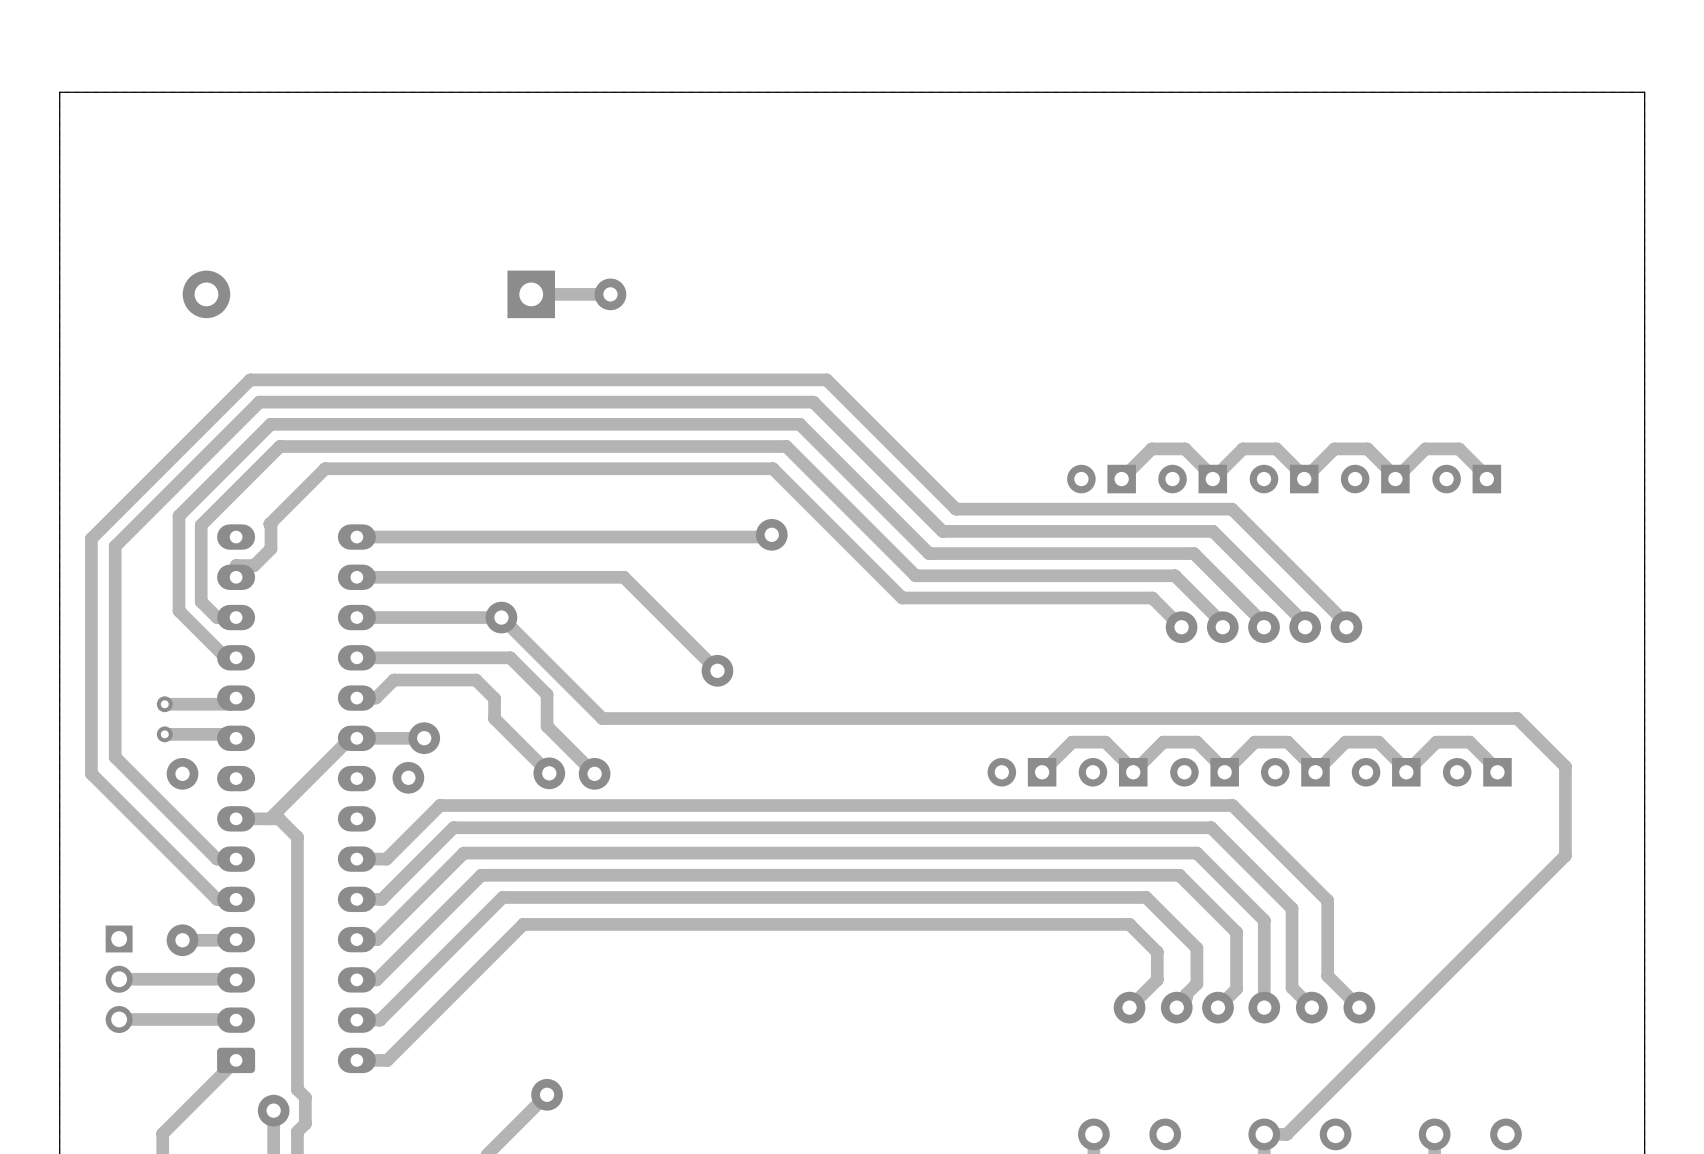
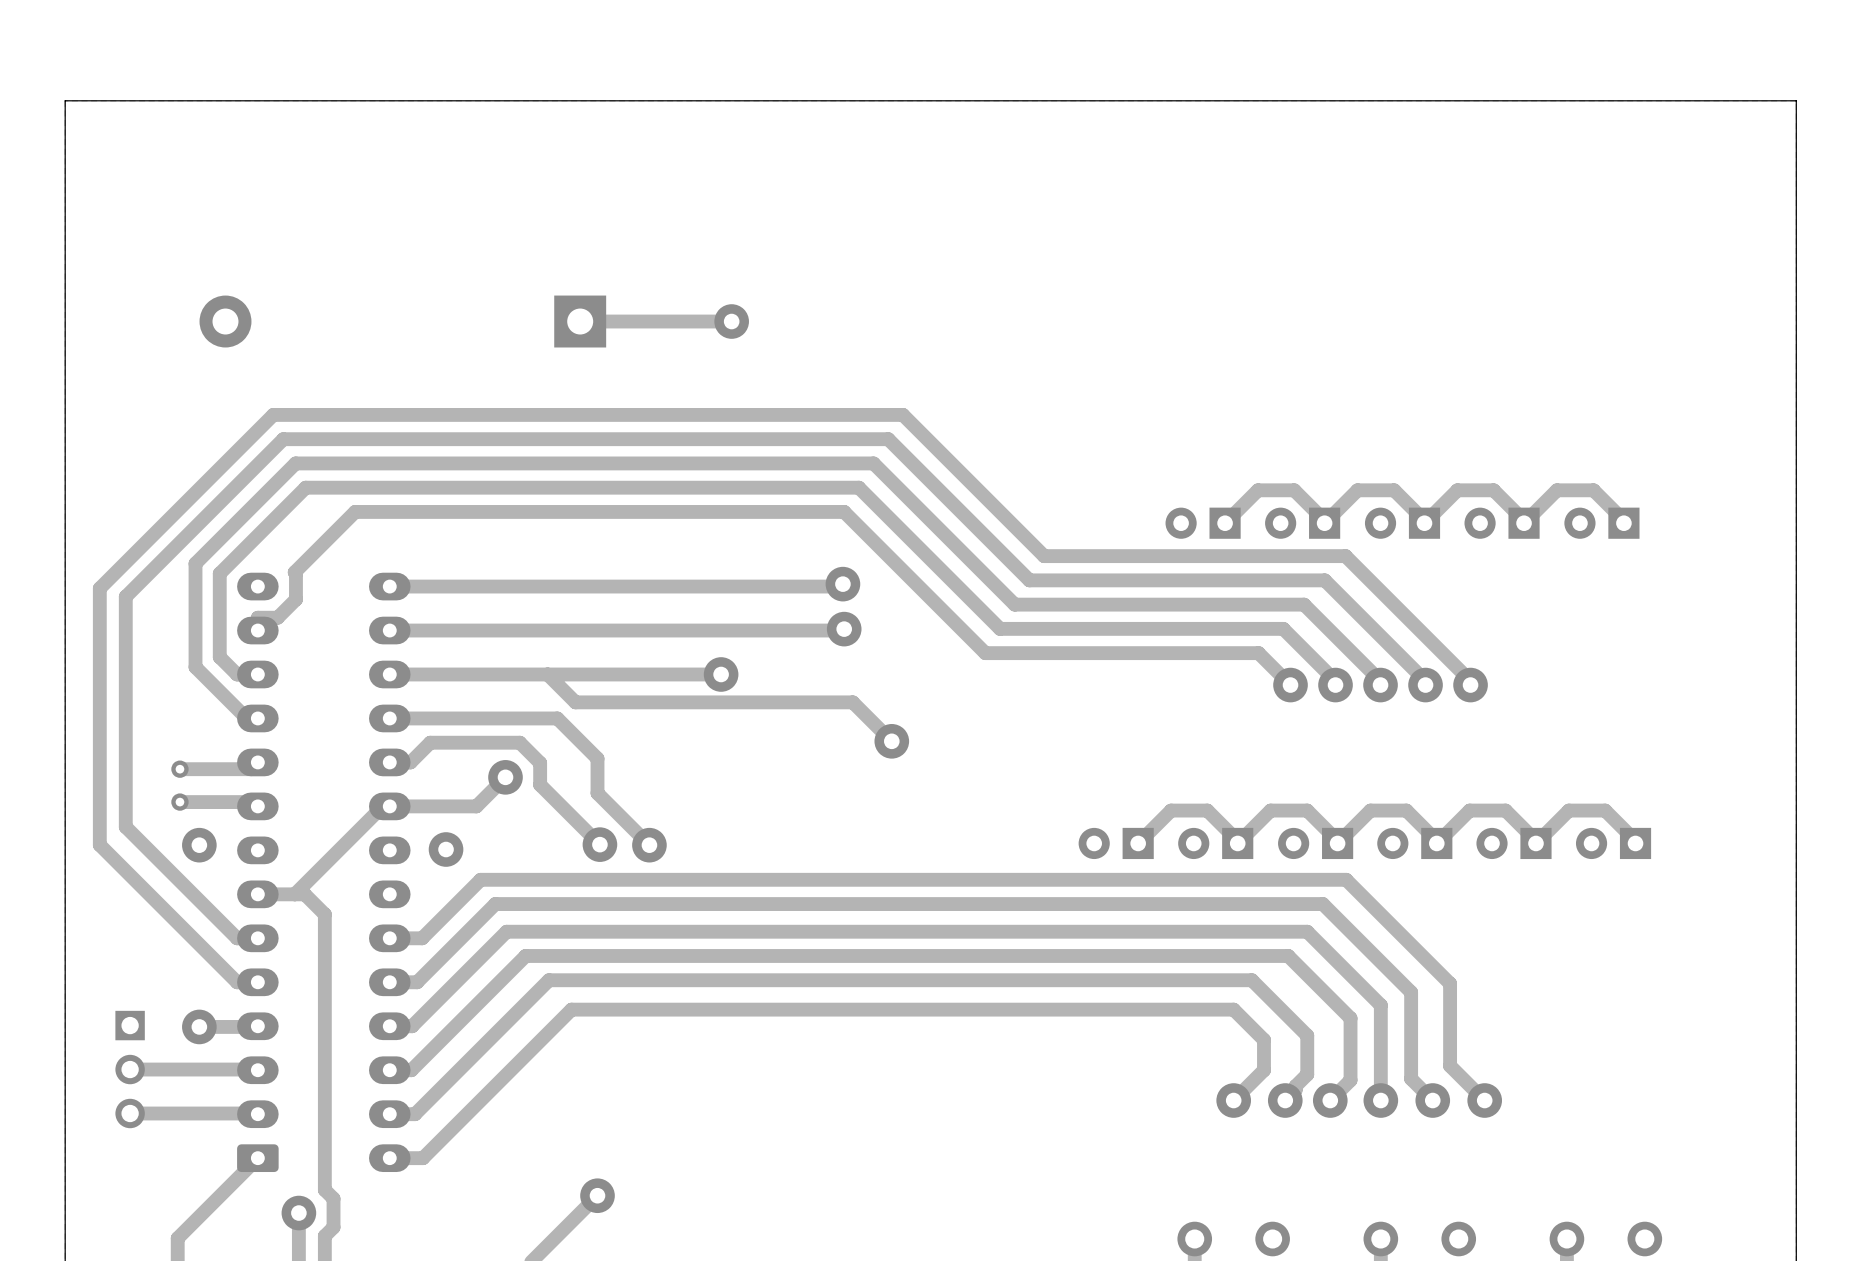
via position: (610, 294) -> (731, 321)
track: none -> (731, 321) (666, 321)
via: none -> (844, 629)
track: (623, 577) (717, 670) -> (681, 630) (844, 629)
via: (501, 617) -> none
track: none -> (721, 674) (547, 674)
via: none -> (721, 674)
track: (526, 643) (602, 718) (1517, 718) (1565, 766) (1565, 855) (1286, 1134) (1264, 1134) -> (575, 702) (852, 702) (891, 741)
via: (717, 670) -> none
via: none -> (891, 741)
track: none -> (505, 777) (476, 806) (463, 806)
via position: (424, 738) -> (505, 777)

